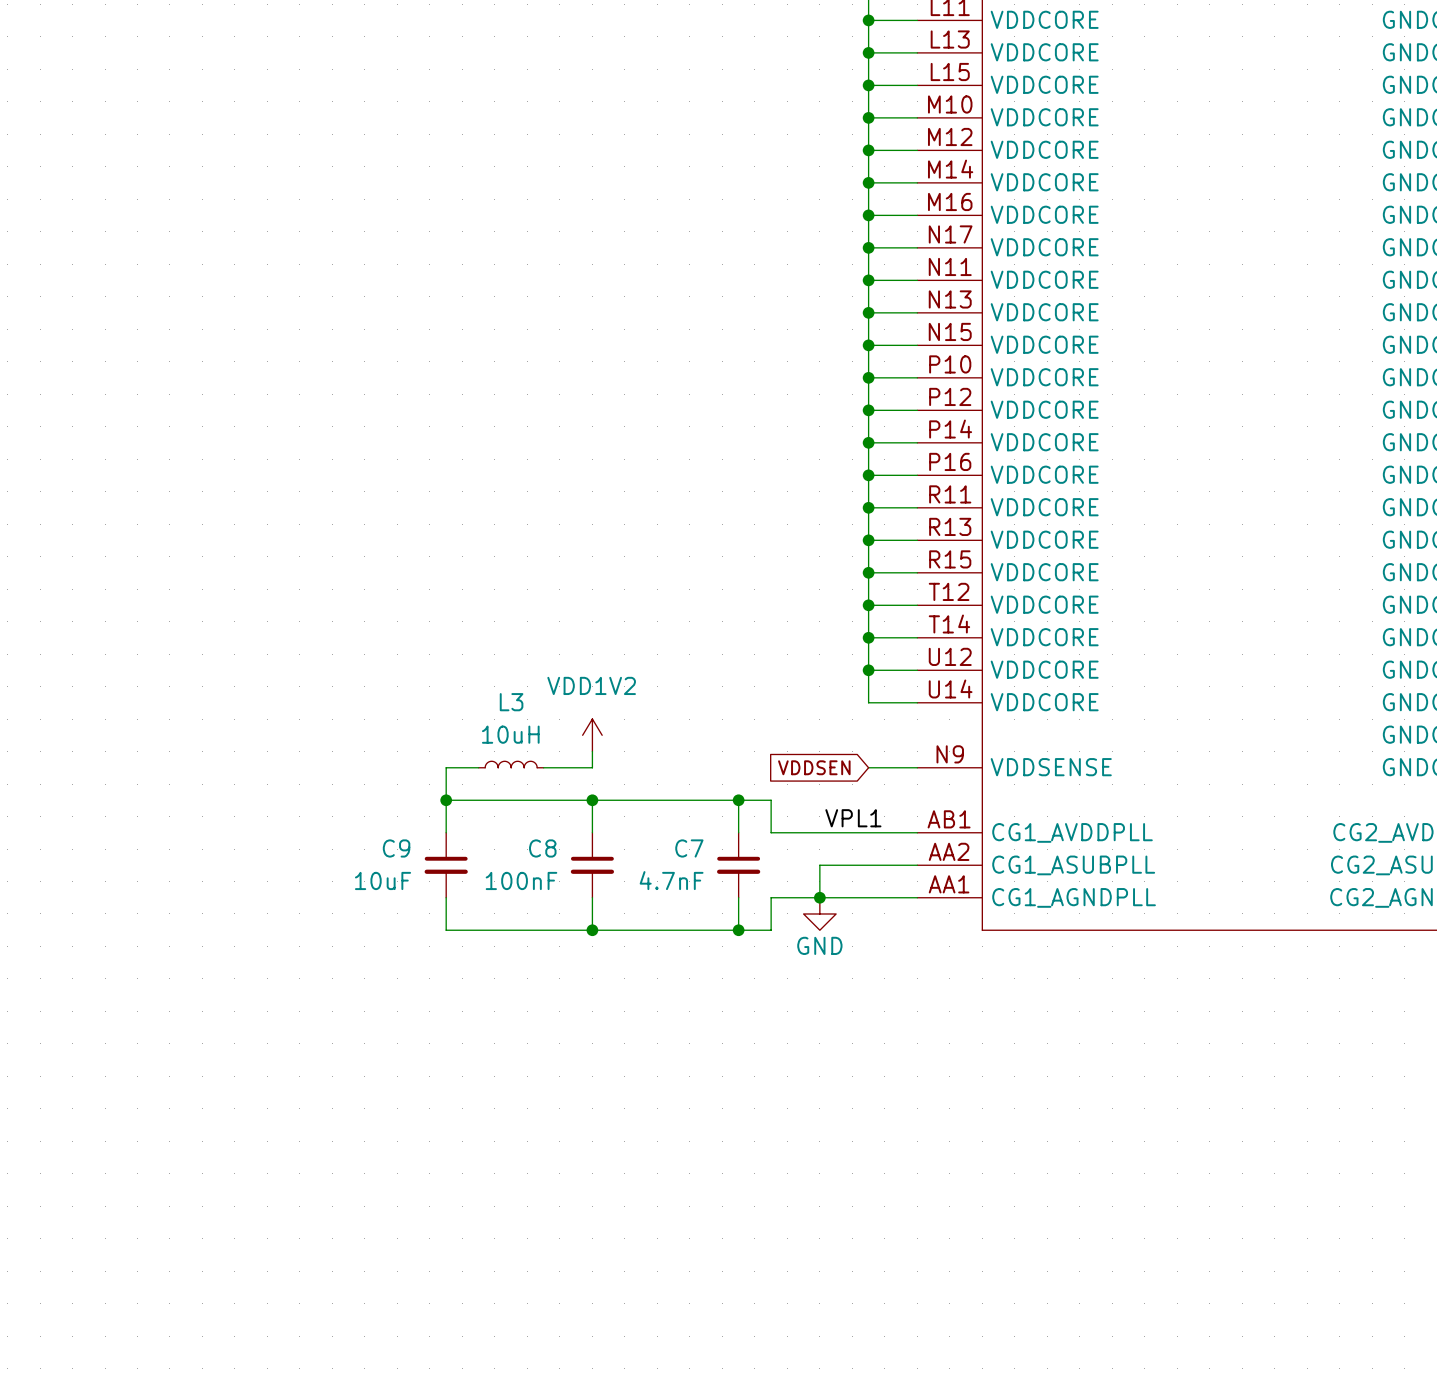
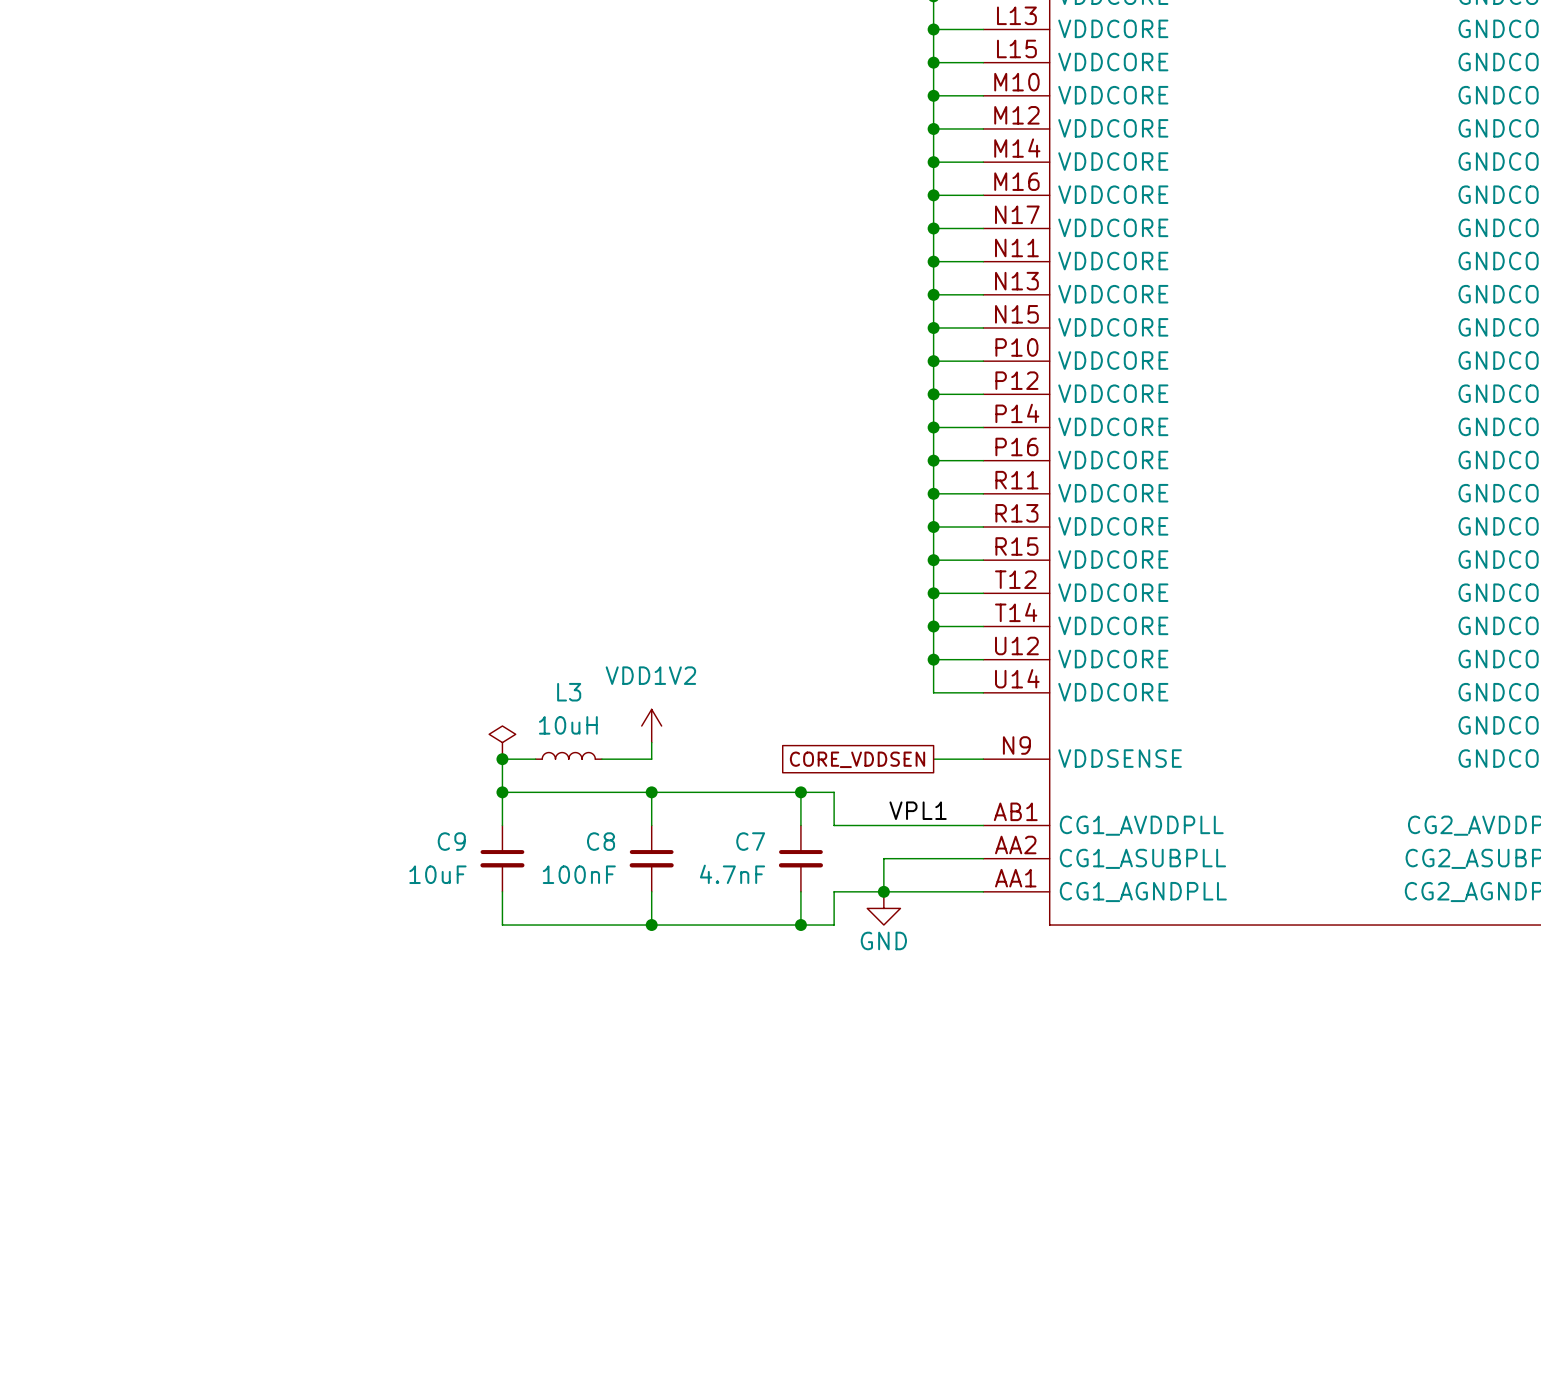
power symbol: none -> (502, 742)
junction: none -> (502, 759)
global label shape: input (814, 767) -> passive (857, 759)
global label: VDDSEN (814, 767) -> CORE_VDDSEN (857, 759)

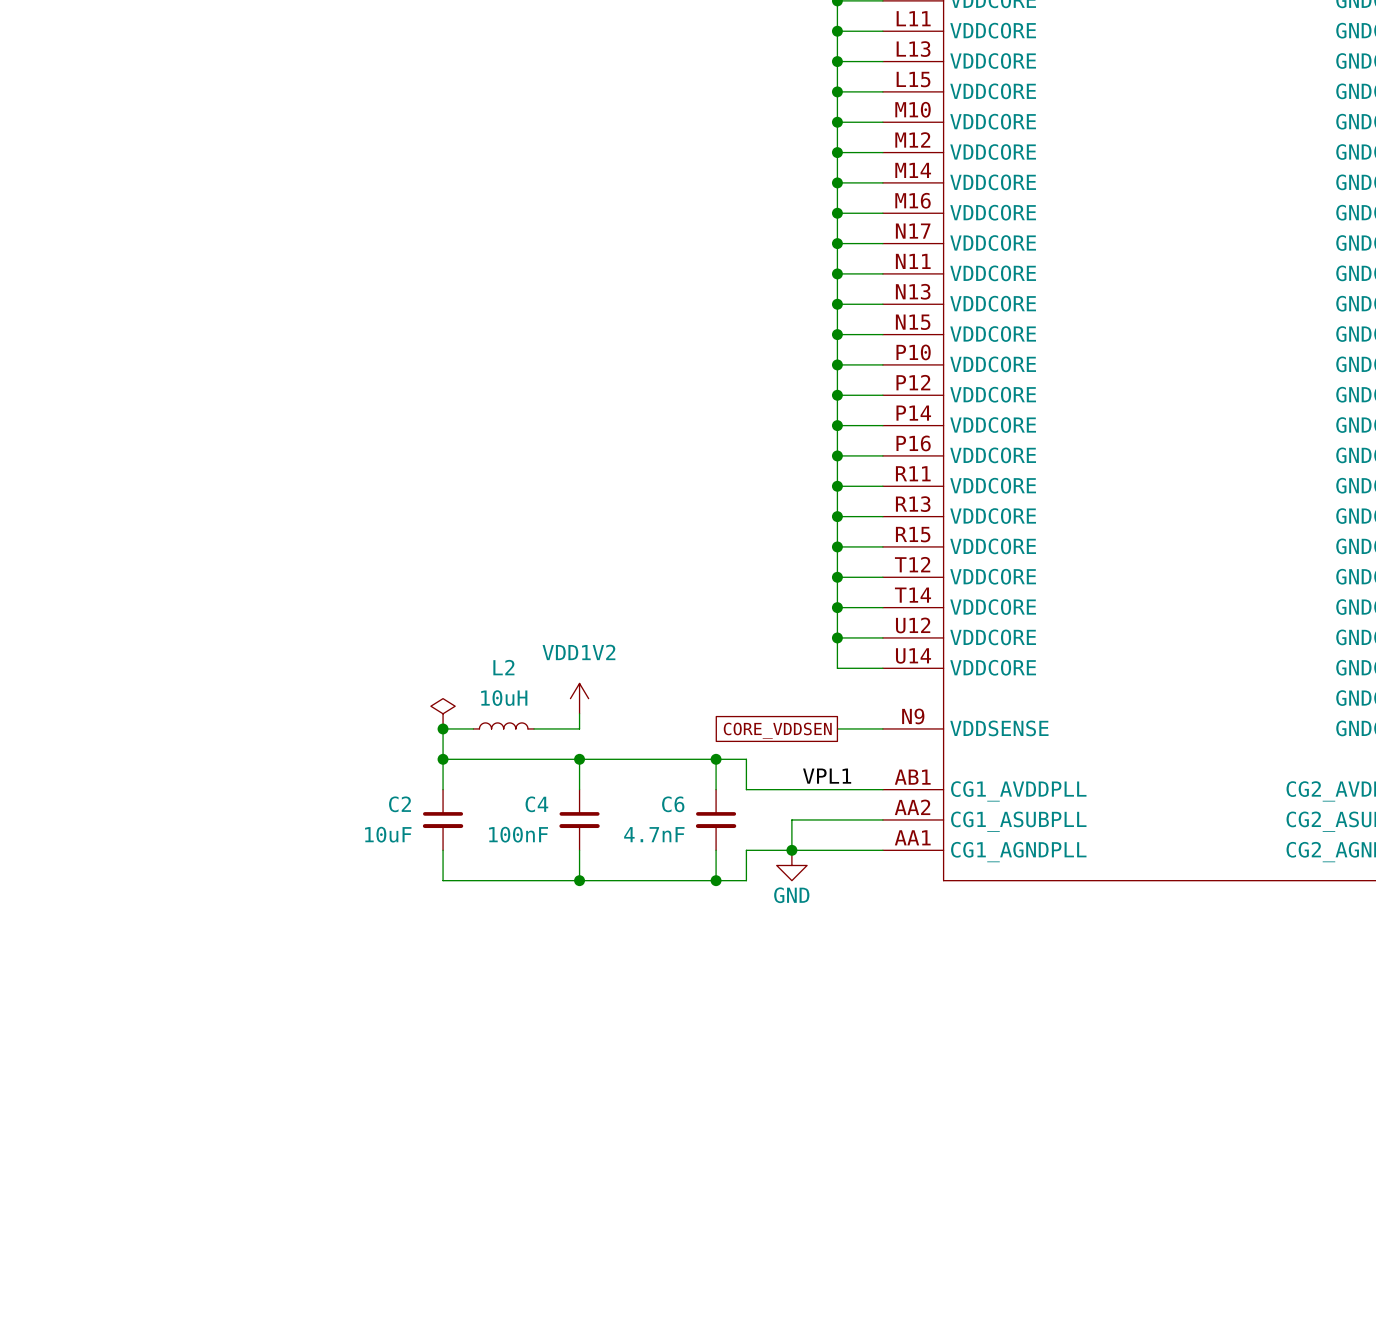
L3 name: L3 (569, 692) -> L2 (503, 667)
C9 name: C9 (451, 841) -> C2 (399, 804)
C8 name: C8 (601, 841) -> C4 (536, 804)
C7 name: C7 (750, 841) -> C6 (673, 804)

